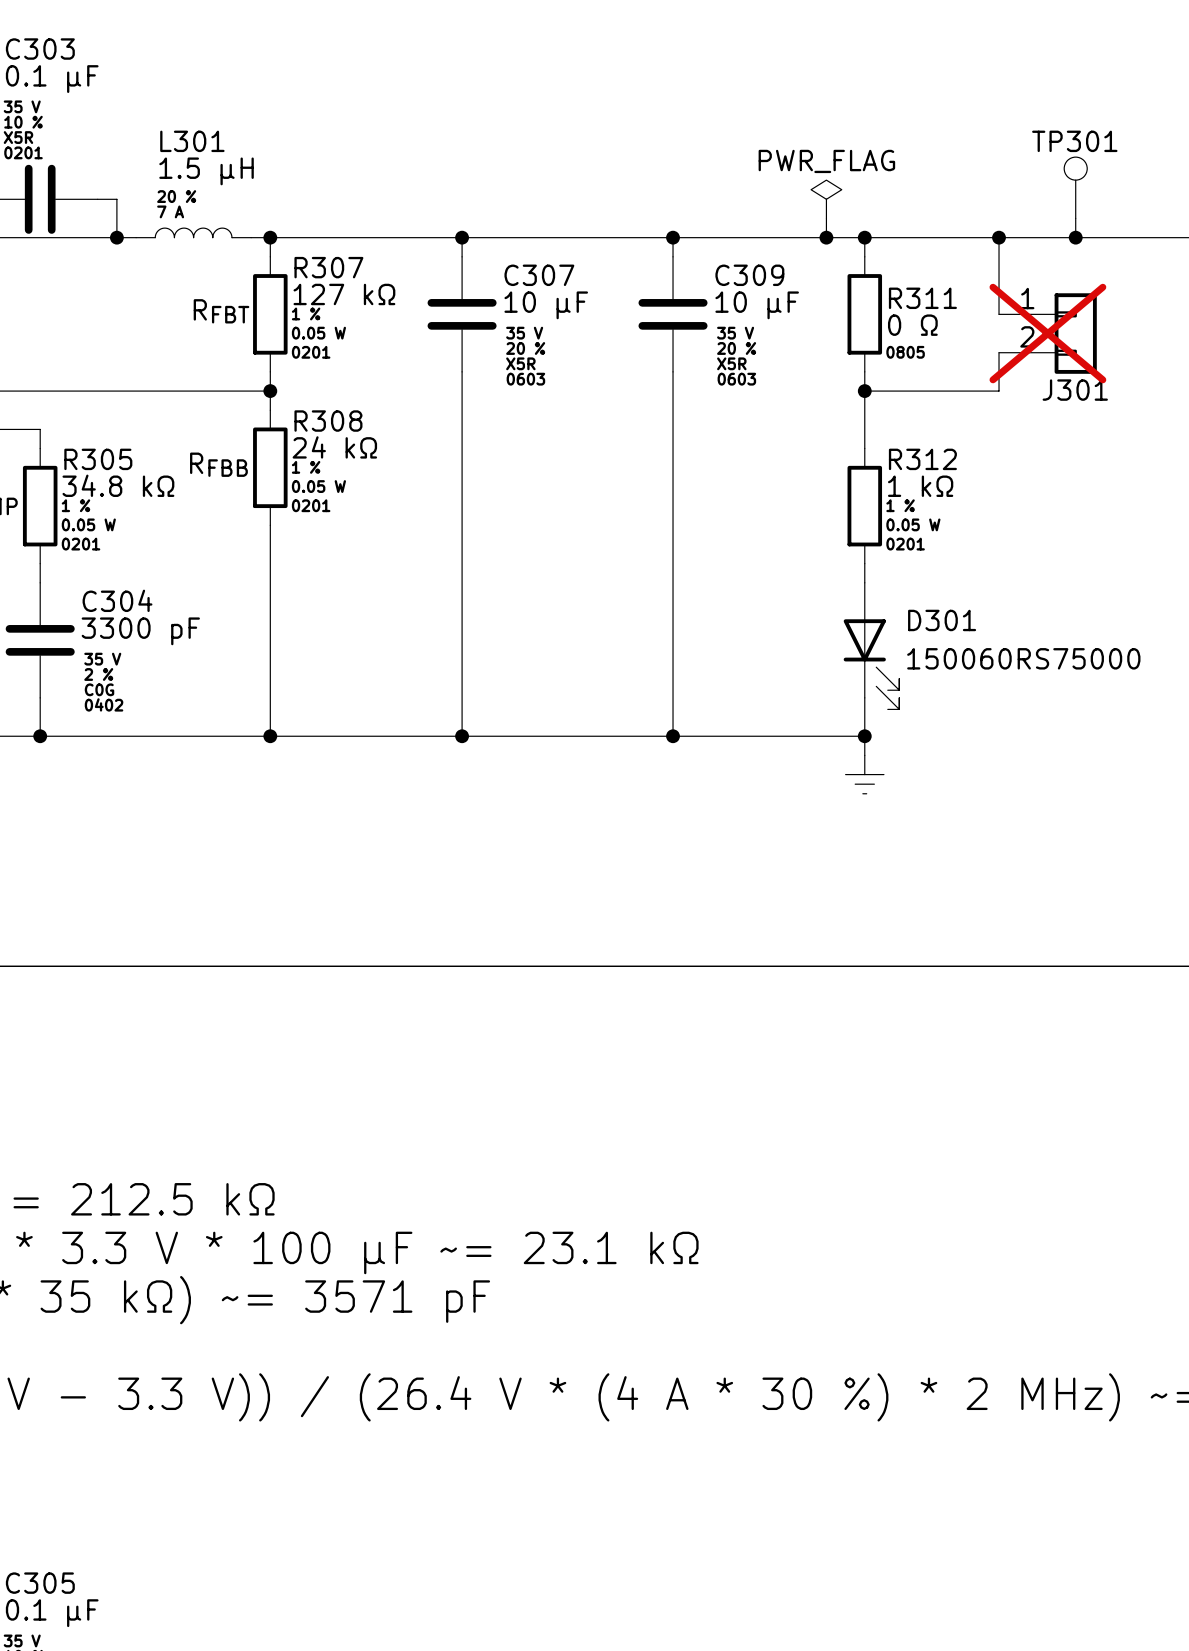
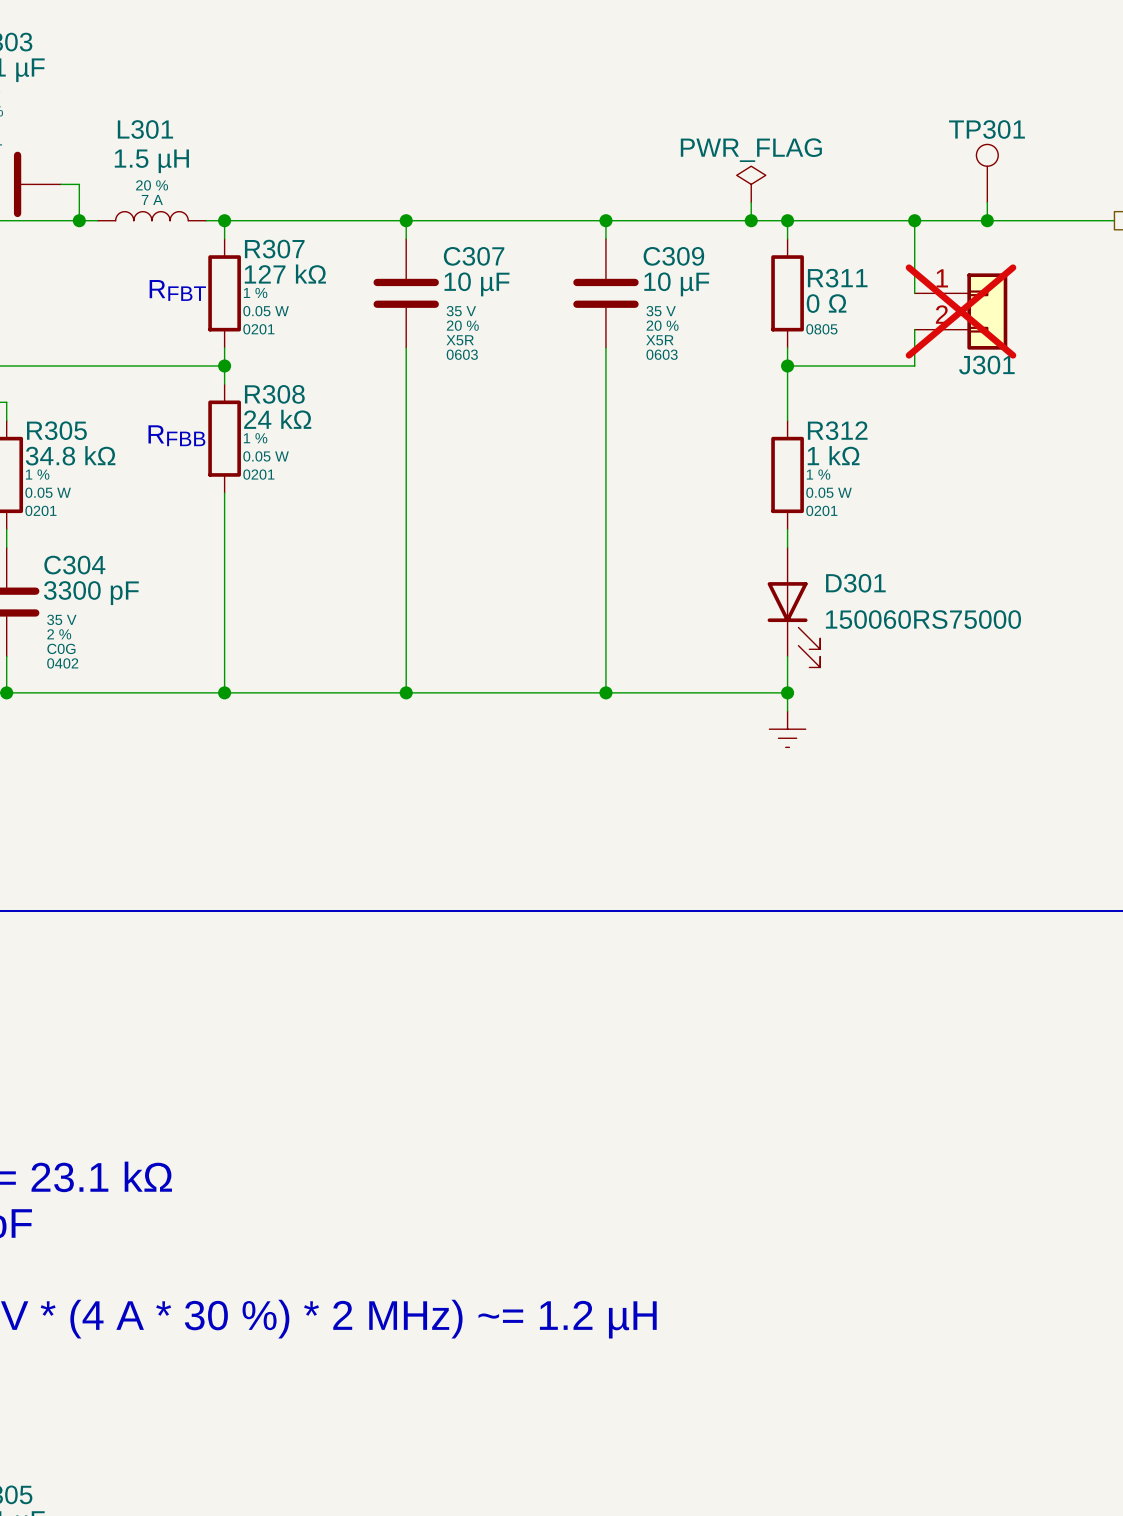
L301 value position: 1.5 µH (206, 171) -> 1.5 µH (151, 161)
L301 text position: 20 % (176, 196) -> 20 % (152, 185)
L301 text position: 7 A (170, 211) -> 7 A (152, 199)

